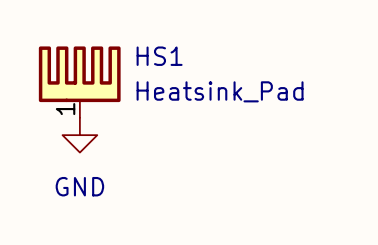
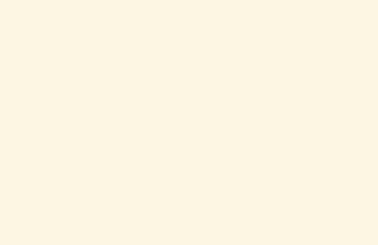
HS1: Heatsink_Pad (79, 82) -> none
power symbol: GND (79, 135) -> none

